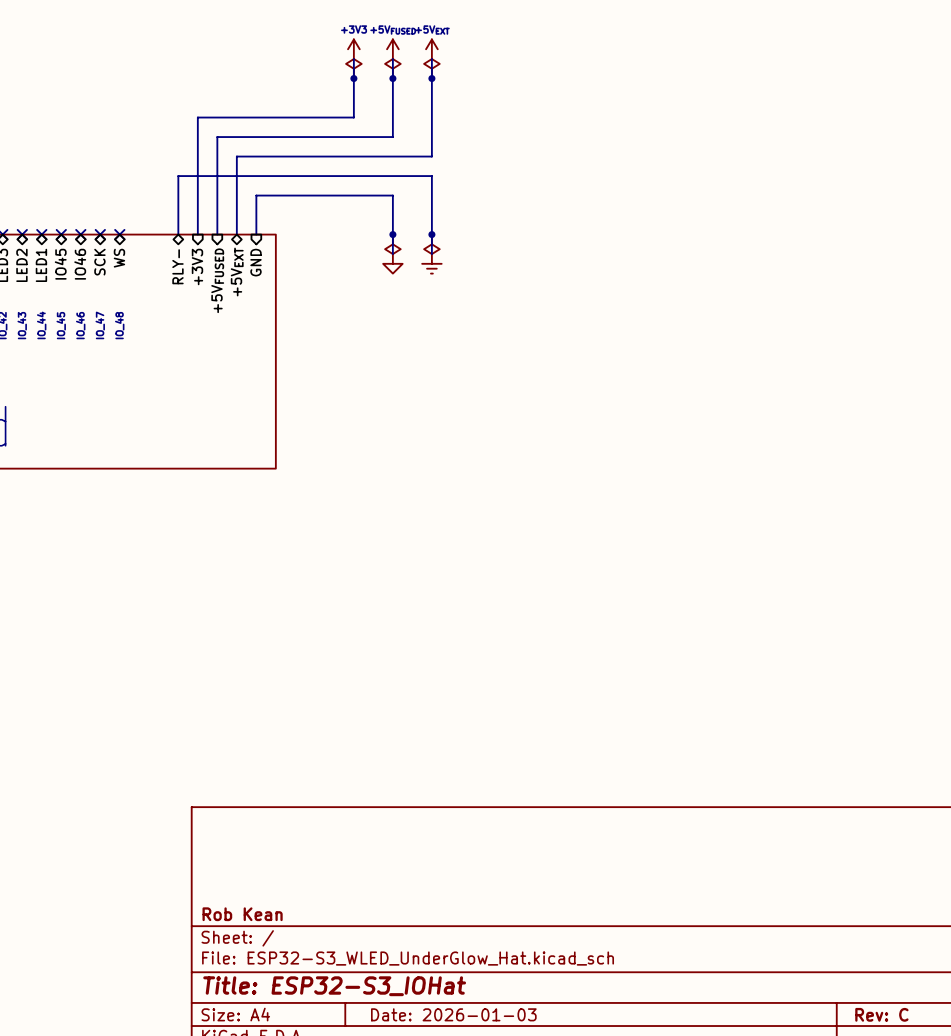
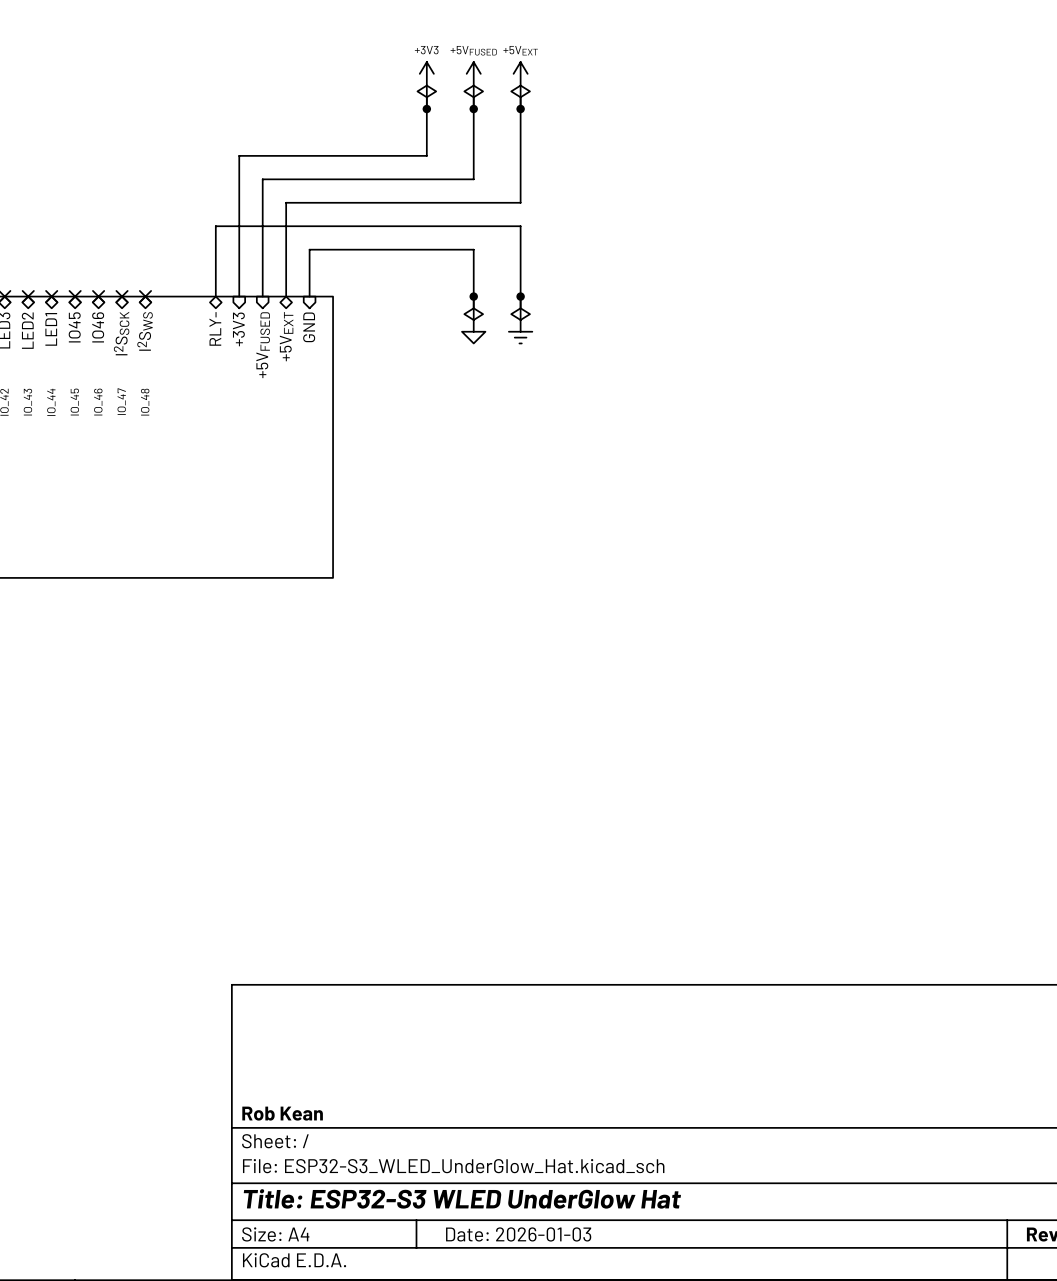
sheet pin: WS (119, 258) -> I2SWS (145, 331)
sheet pin: SCK (99, 262) -> I2SSCK (121, 333)
title block: Title: ESP32-S3_IOHat (334, 986) -> Title: ESP32-S3 WLED UnderGlow Hat (462, 1198)

